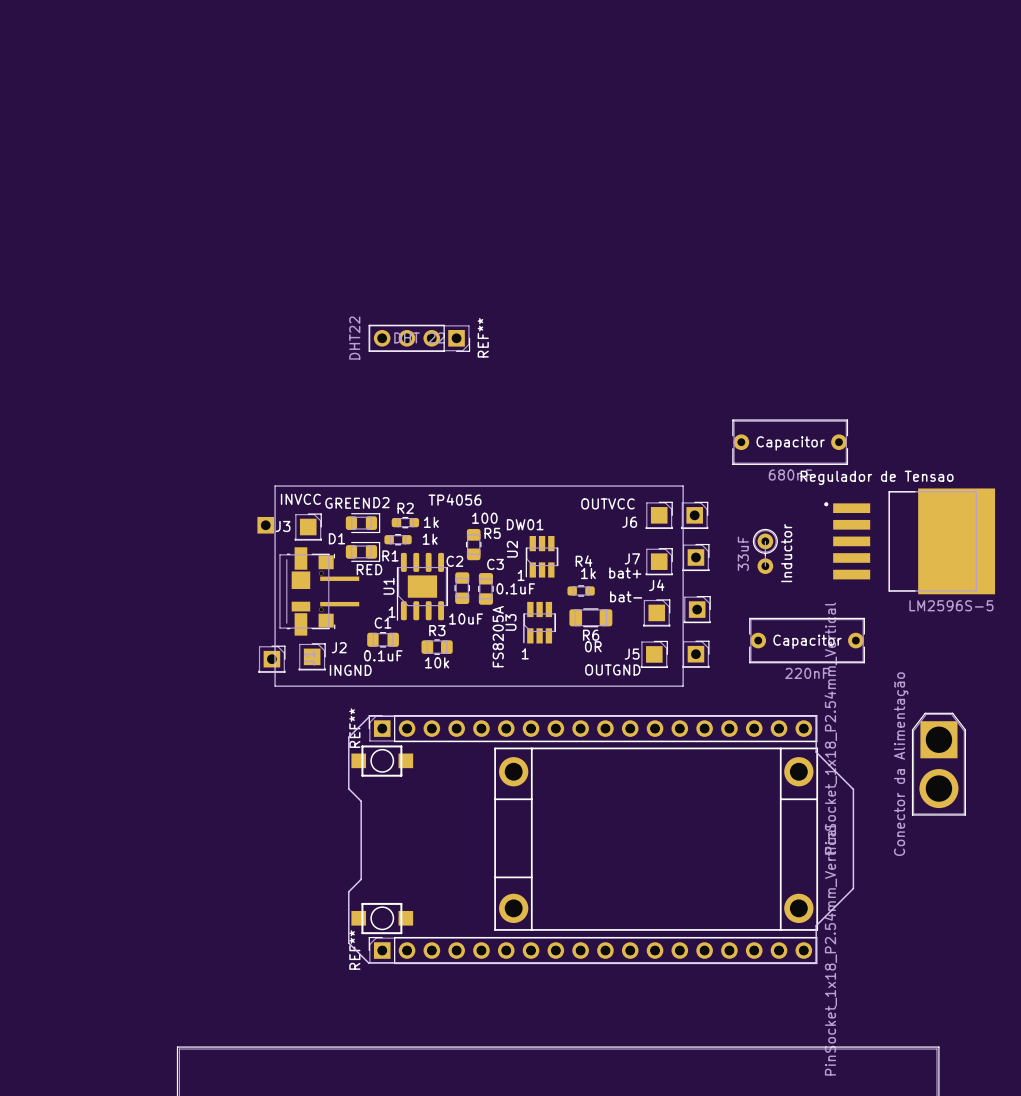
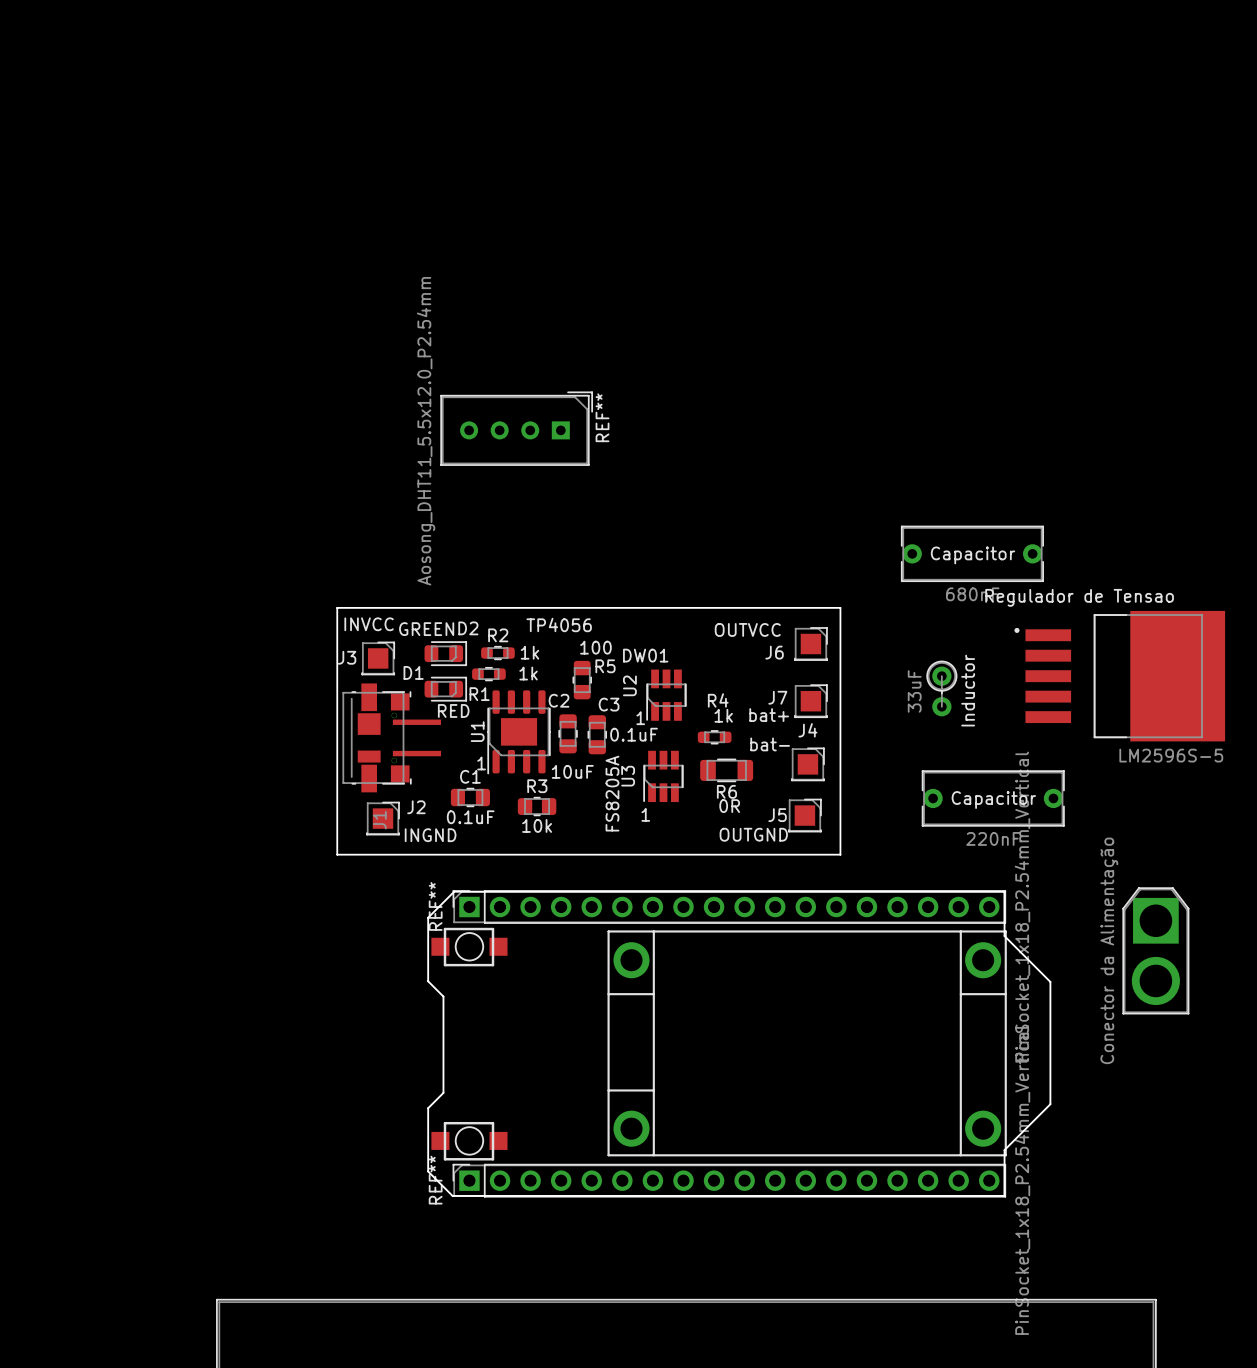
REF** footprint: [368, 324, 471, 352] -> [440, 391, 593, 466]
REF** value: DHT22 (354, 338) -> Aosong_DHT11_5.5x12.0_P2.54mm (426, 431)
part: (694, 515) -> none
part: (265, 525) -> none
part: (695, 557) -> none
part: (697, 609) -> none
part: (695, 654) -> none
part: (271, 659) -> none

